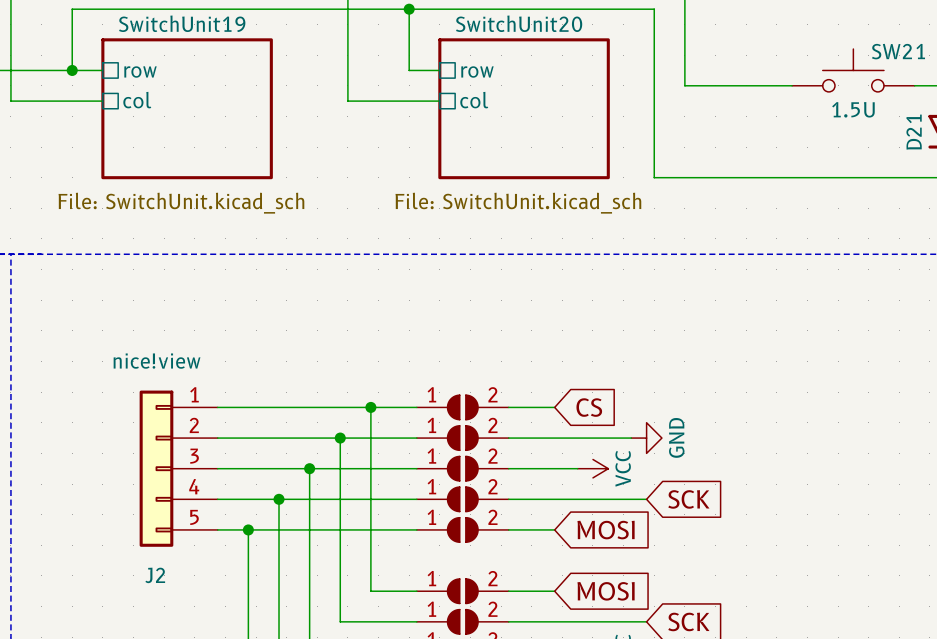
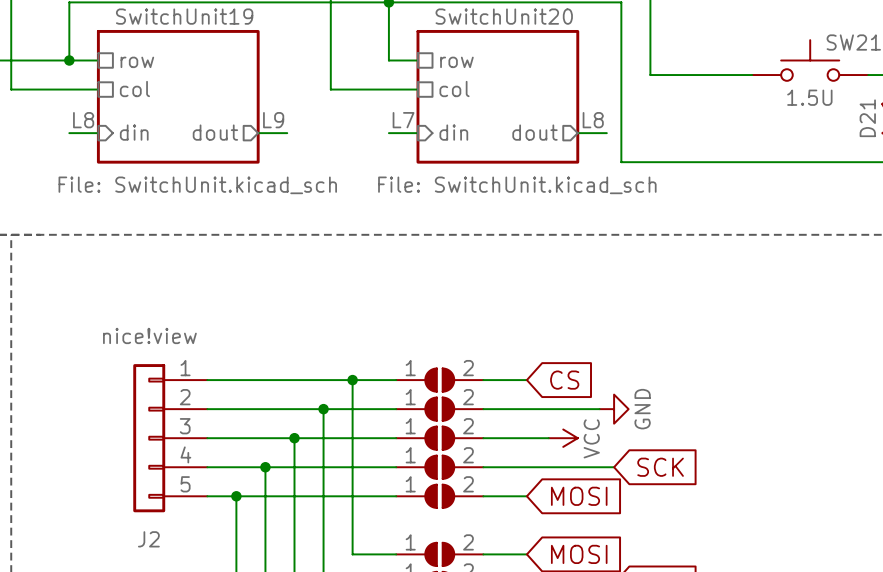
label: none -> L8 (83, 120)
label: none -> L9 (273, 120)
label: none -> L7 (403, 120)
label: none -> L8 (593, 120)
sheet pin: none -> din (134, 132)
sheet pin: none -> dout (215, 132)
sheet pin: none -> din (453, 132)
sheet pin: none -> dout (535, 132)
wire: none -> (69, 133) (98, 133)
wire: none -> (258, 133) (287, 133)
wire: none -> (388, 133) (417, 133)
wire: none -> (577, 133) (606, 133)

